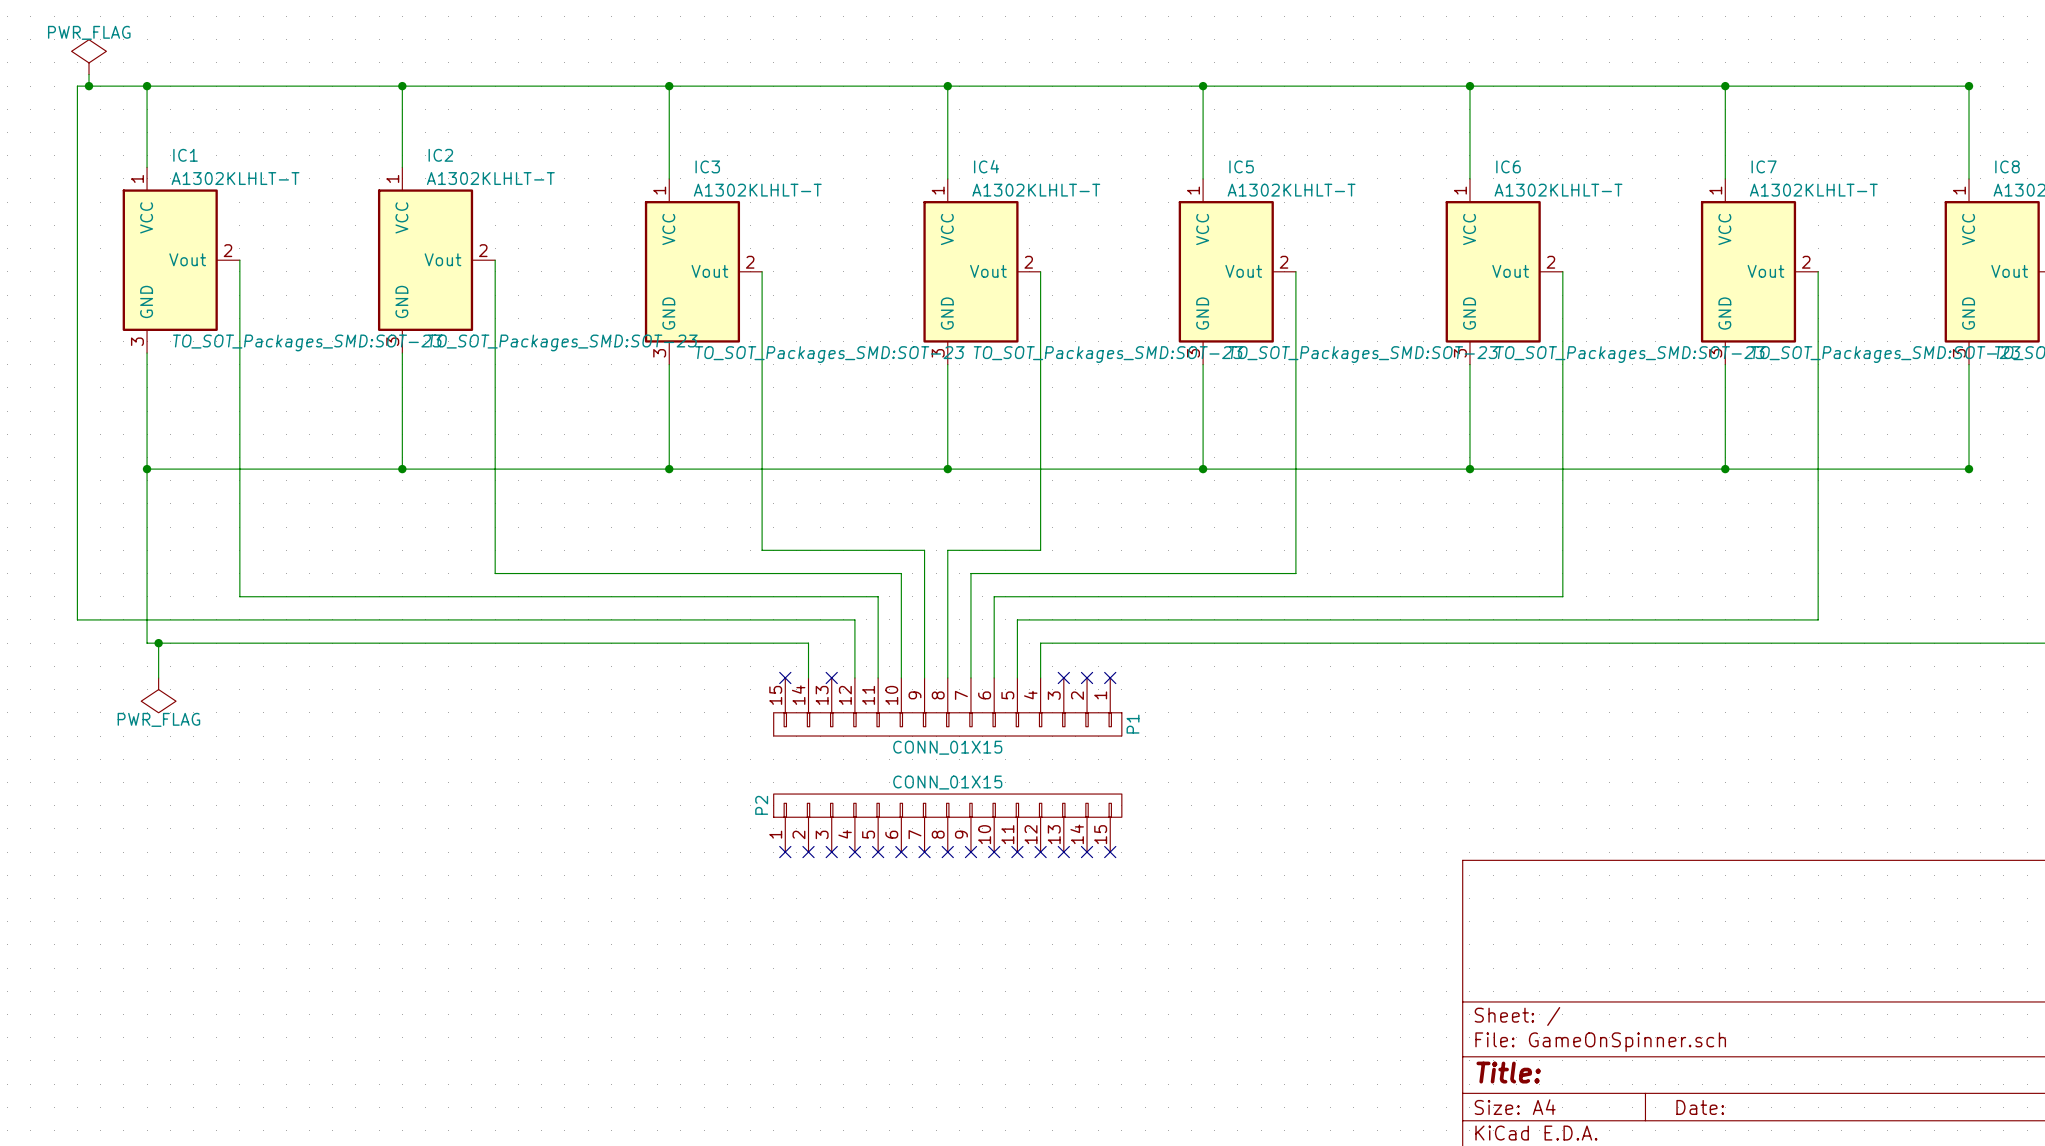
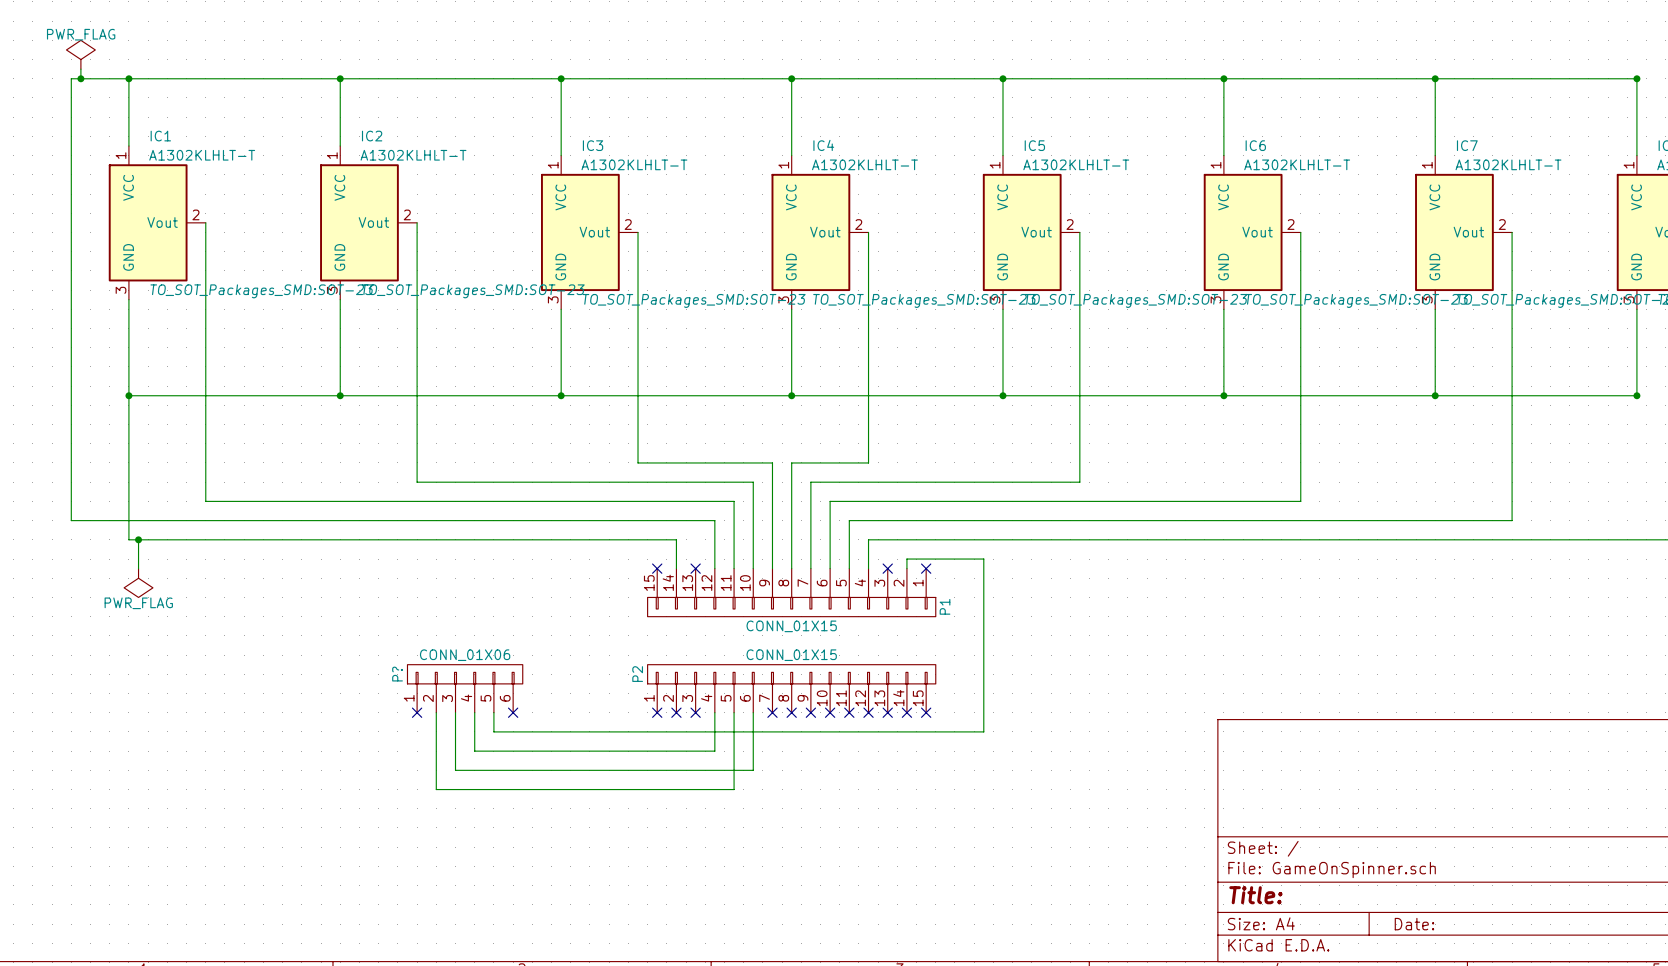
wire: none -> (906, 568) (906, 559) (983, 559) (983, 731) (493, 731) (493, 712)
no-connect mark: (1087, 677) -> none
P?: none -> CONN_01X06 (465, 688)
no-connect mark: none -> (417, 712)
wire: none -> (436, 712) (436, 789) (734, 789) (734, 712)
wire: none -> (455, 712) (455, 770) (753, 770) (753, 712)
wire: none -> (474, 712) (474, 751) (714, 751) (714, 712)
no-connect mark: none -> (513, 712)
no-connect mark: (854, 852) -> none
no-connect mark: (878, 852) -> none
no-connect mark: (901, 852) -> none

